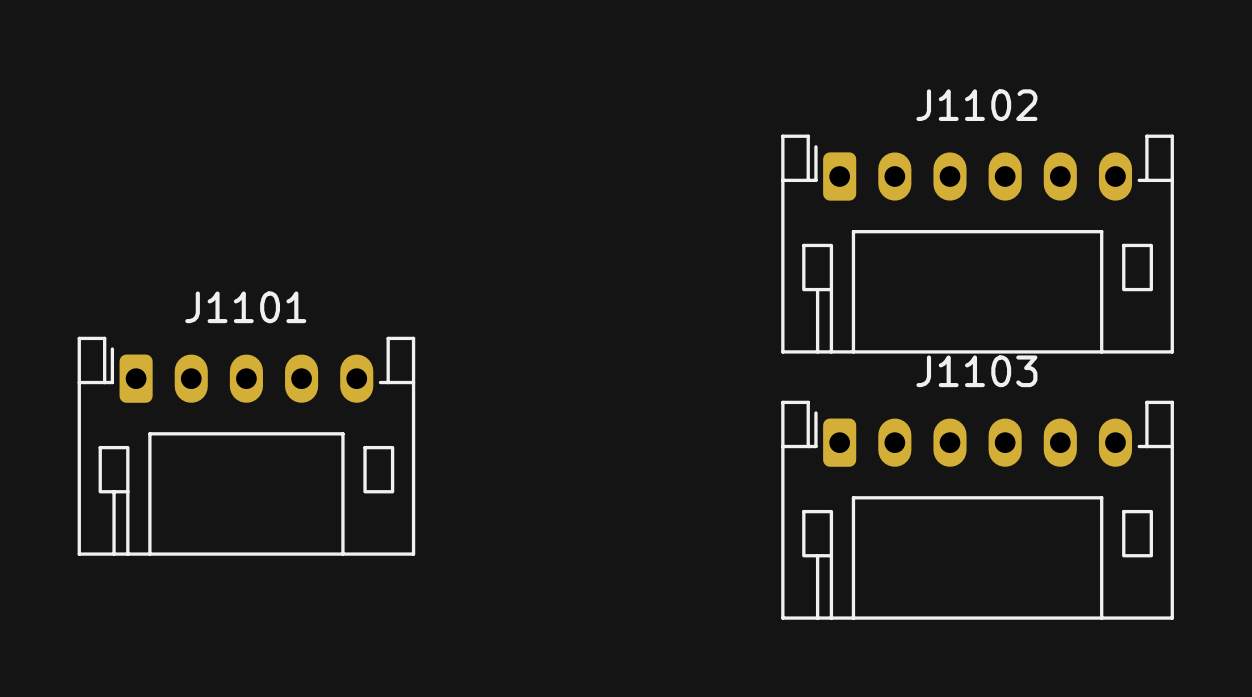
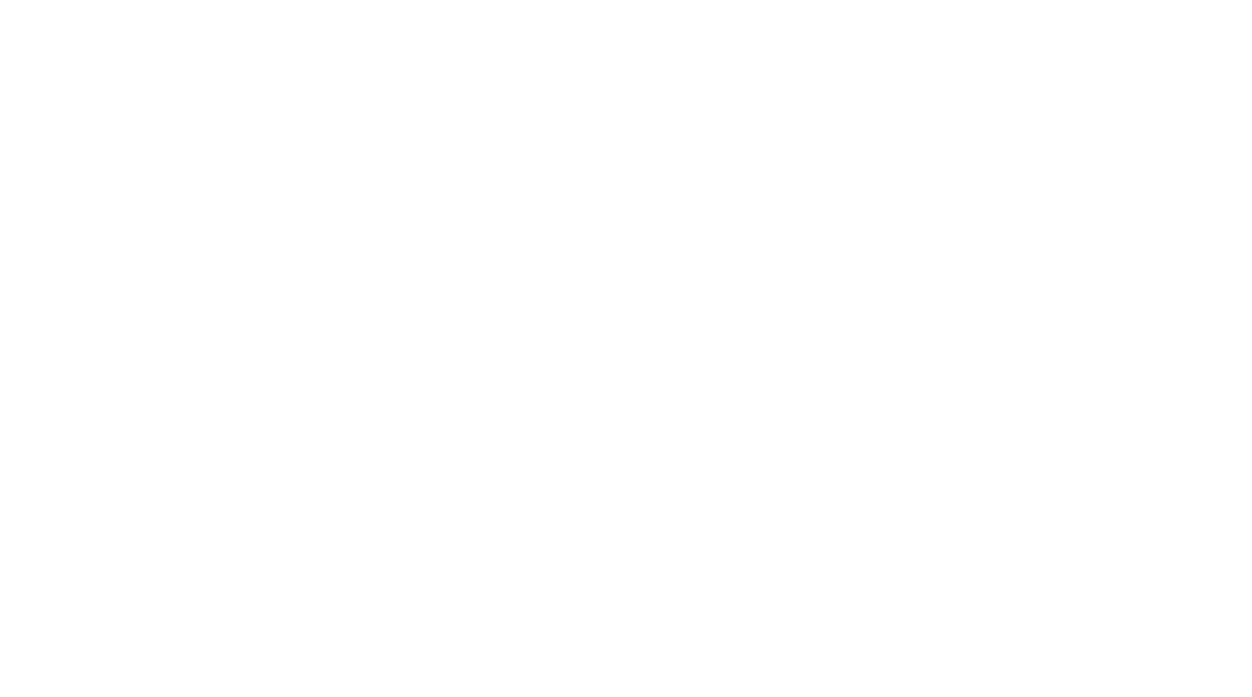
J1102: (977, 244) -> none
J1101: (246, 446) -> none
J1103: (977, 510) -> none

